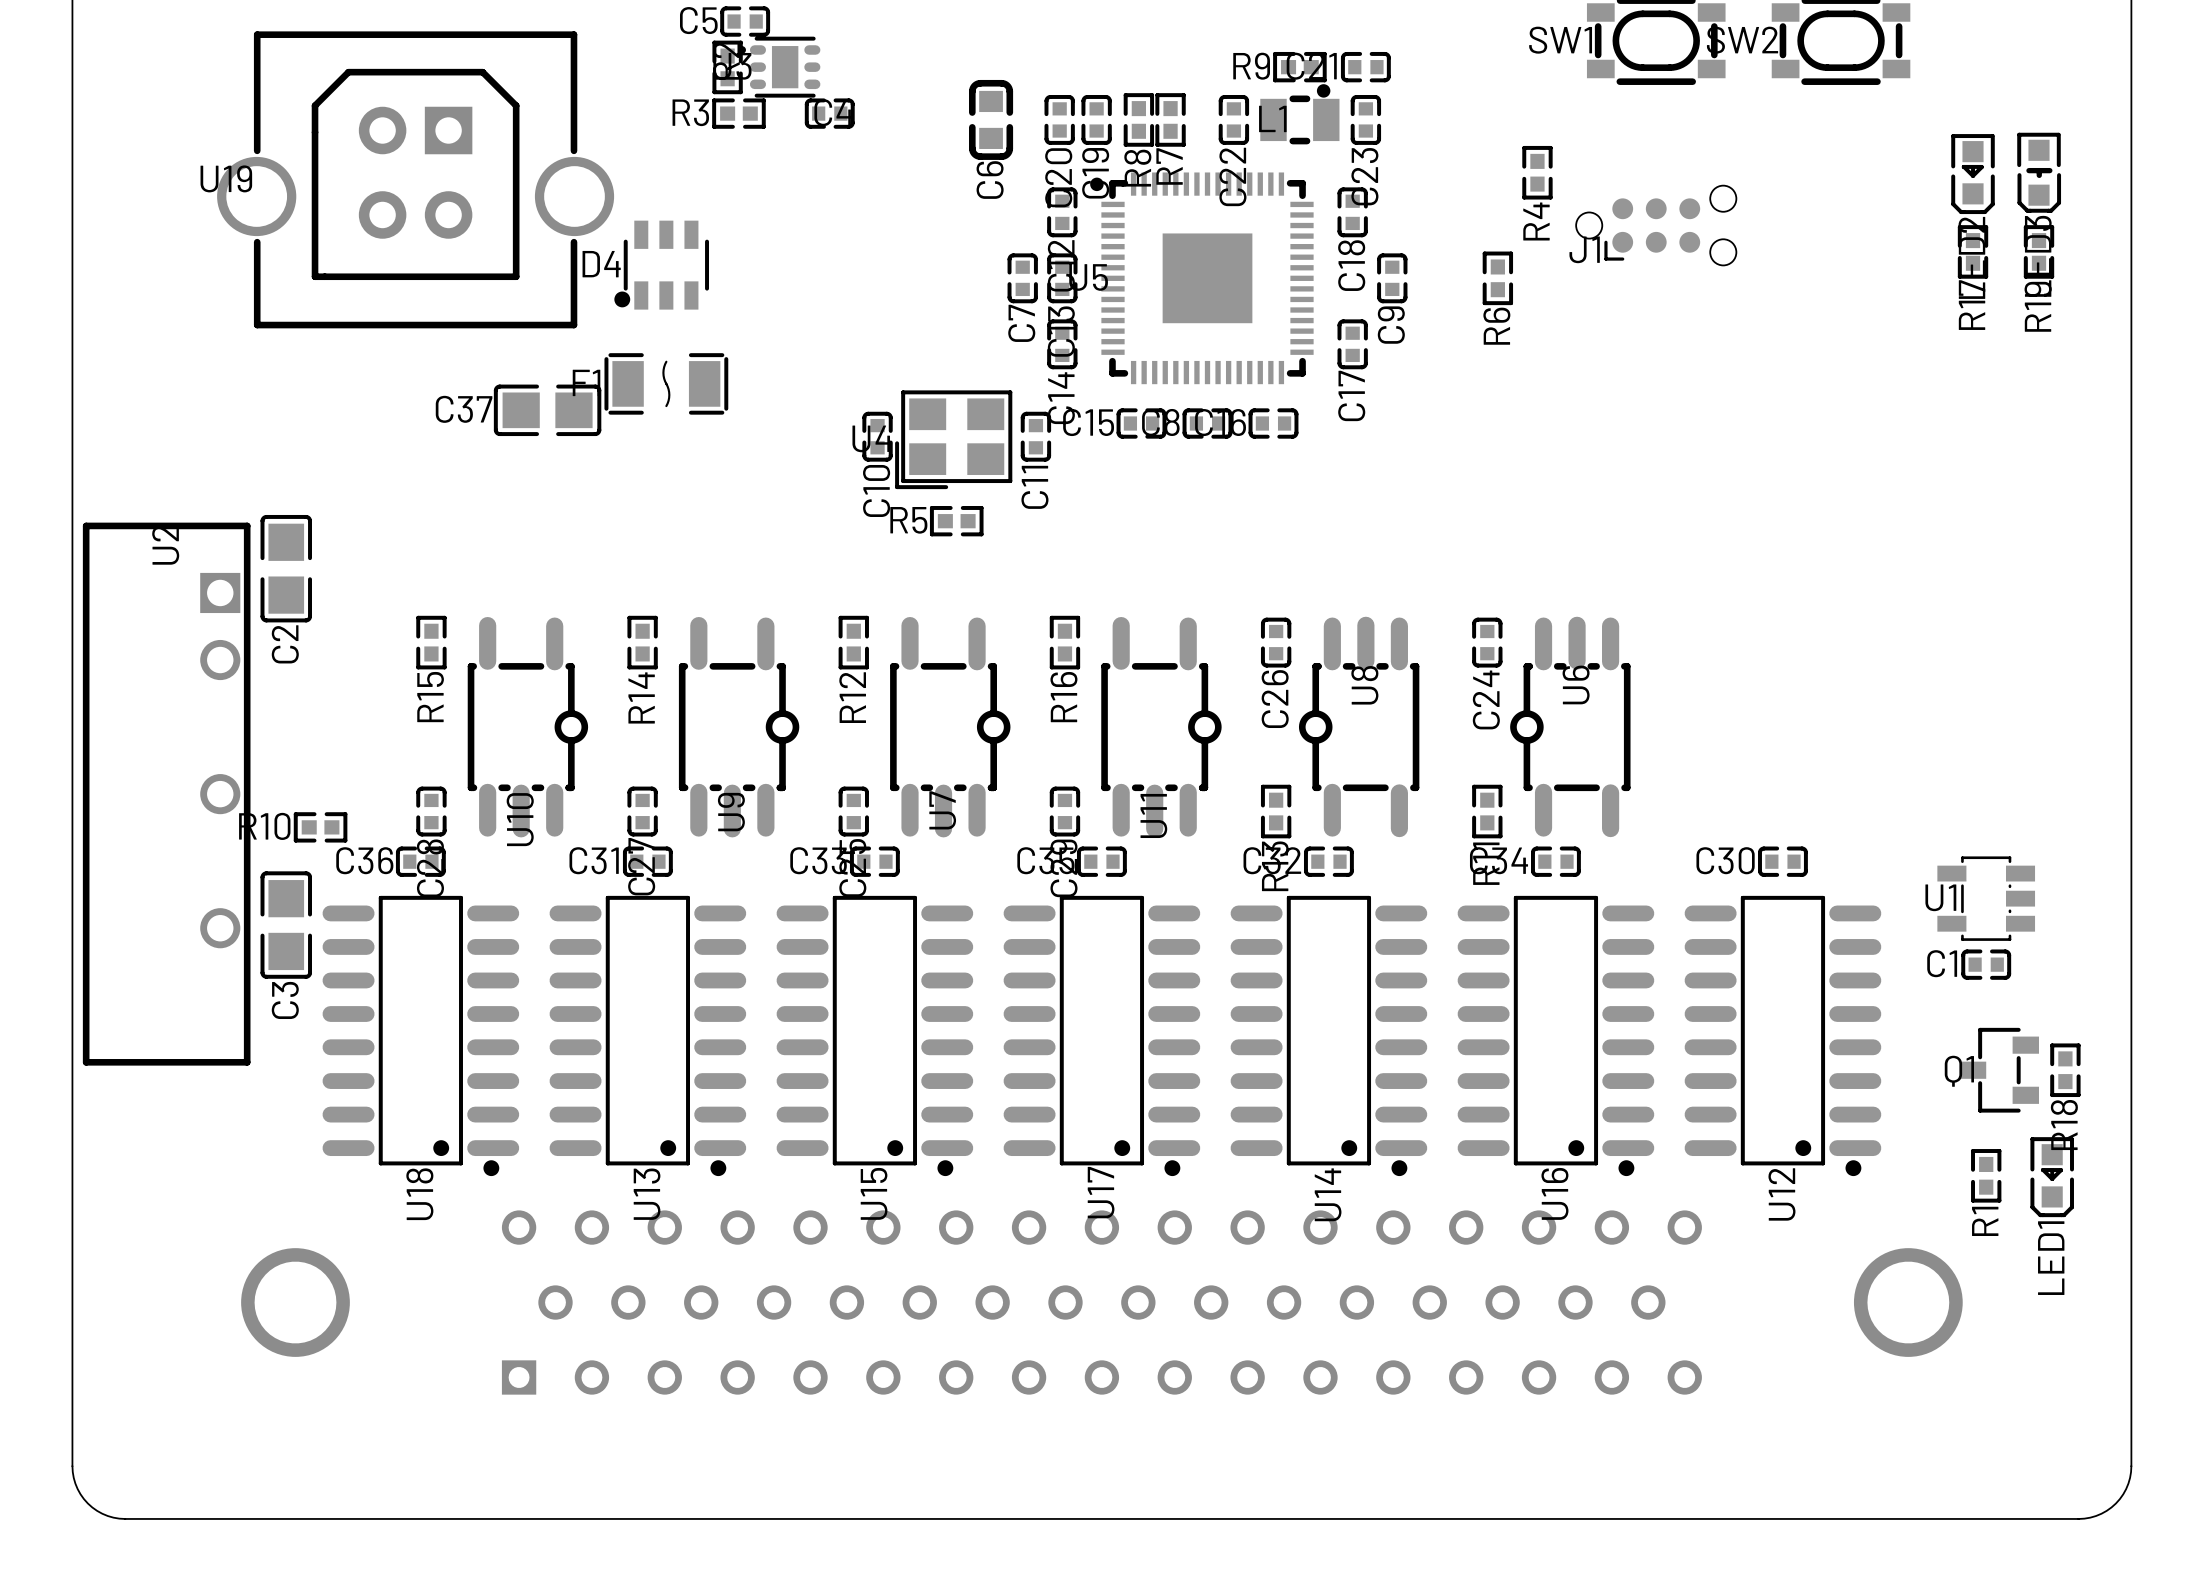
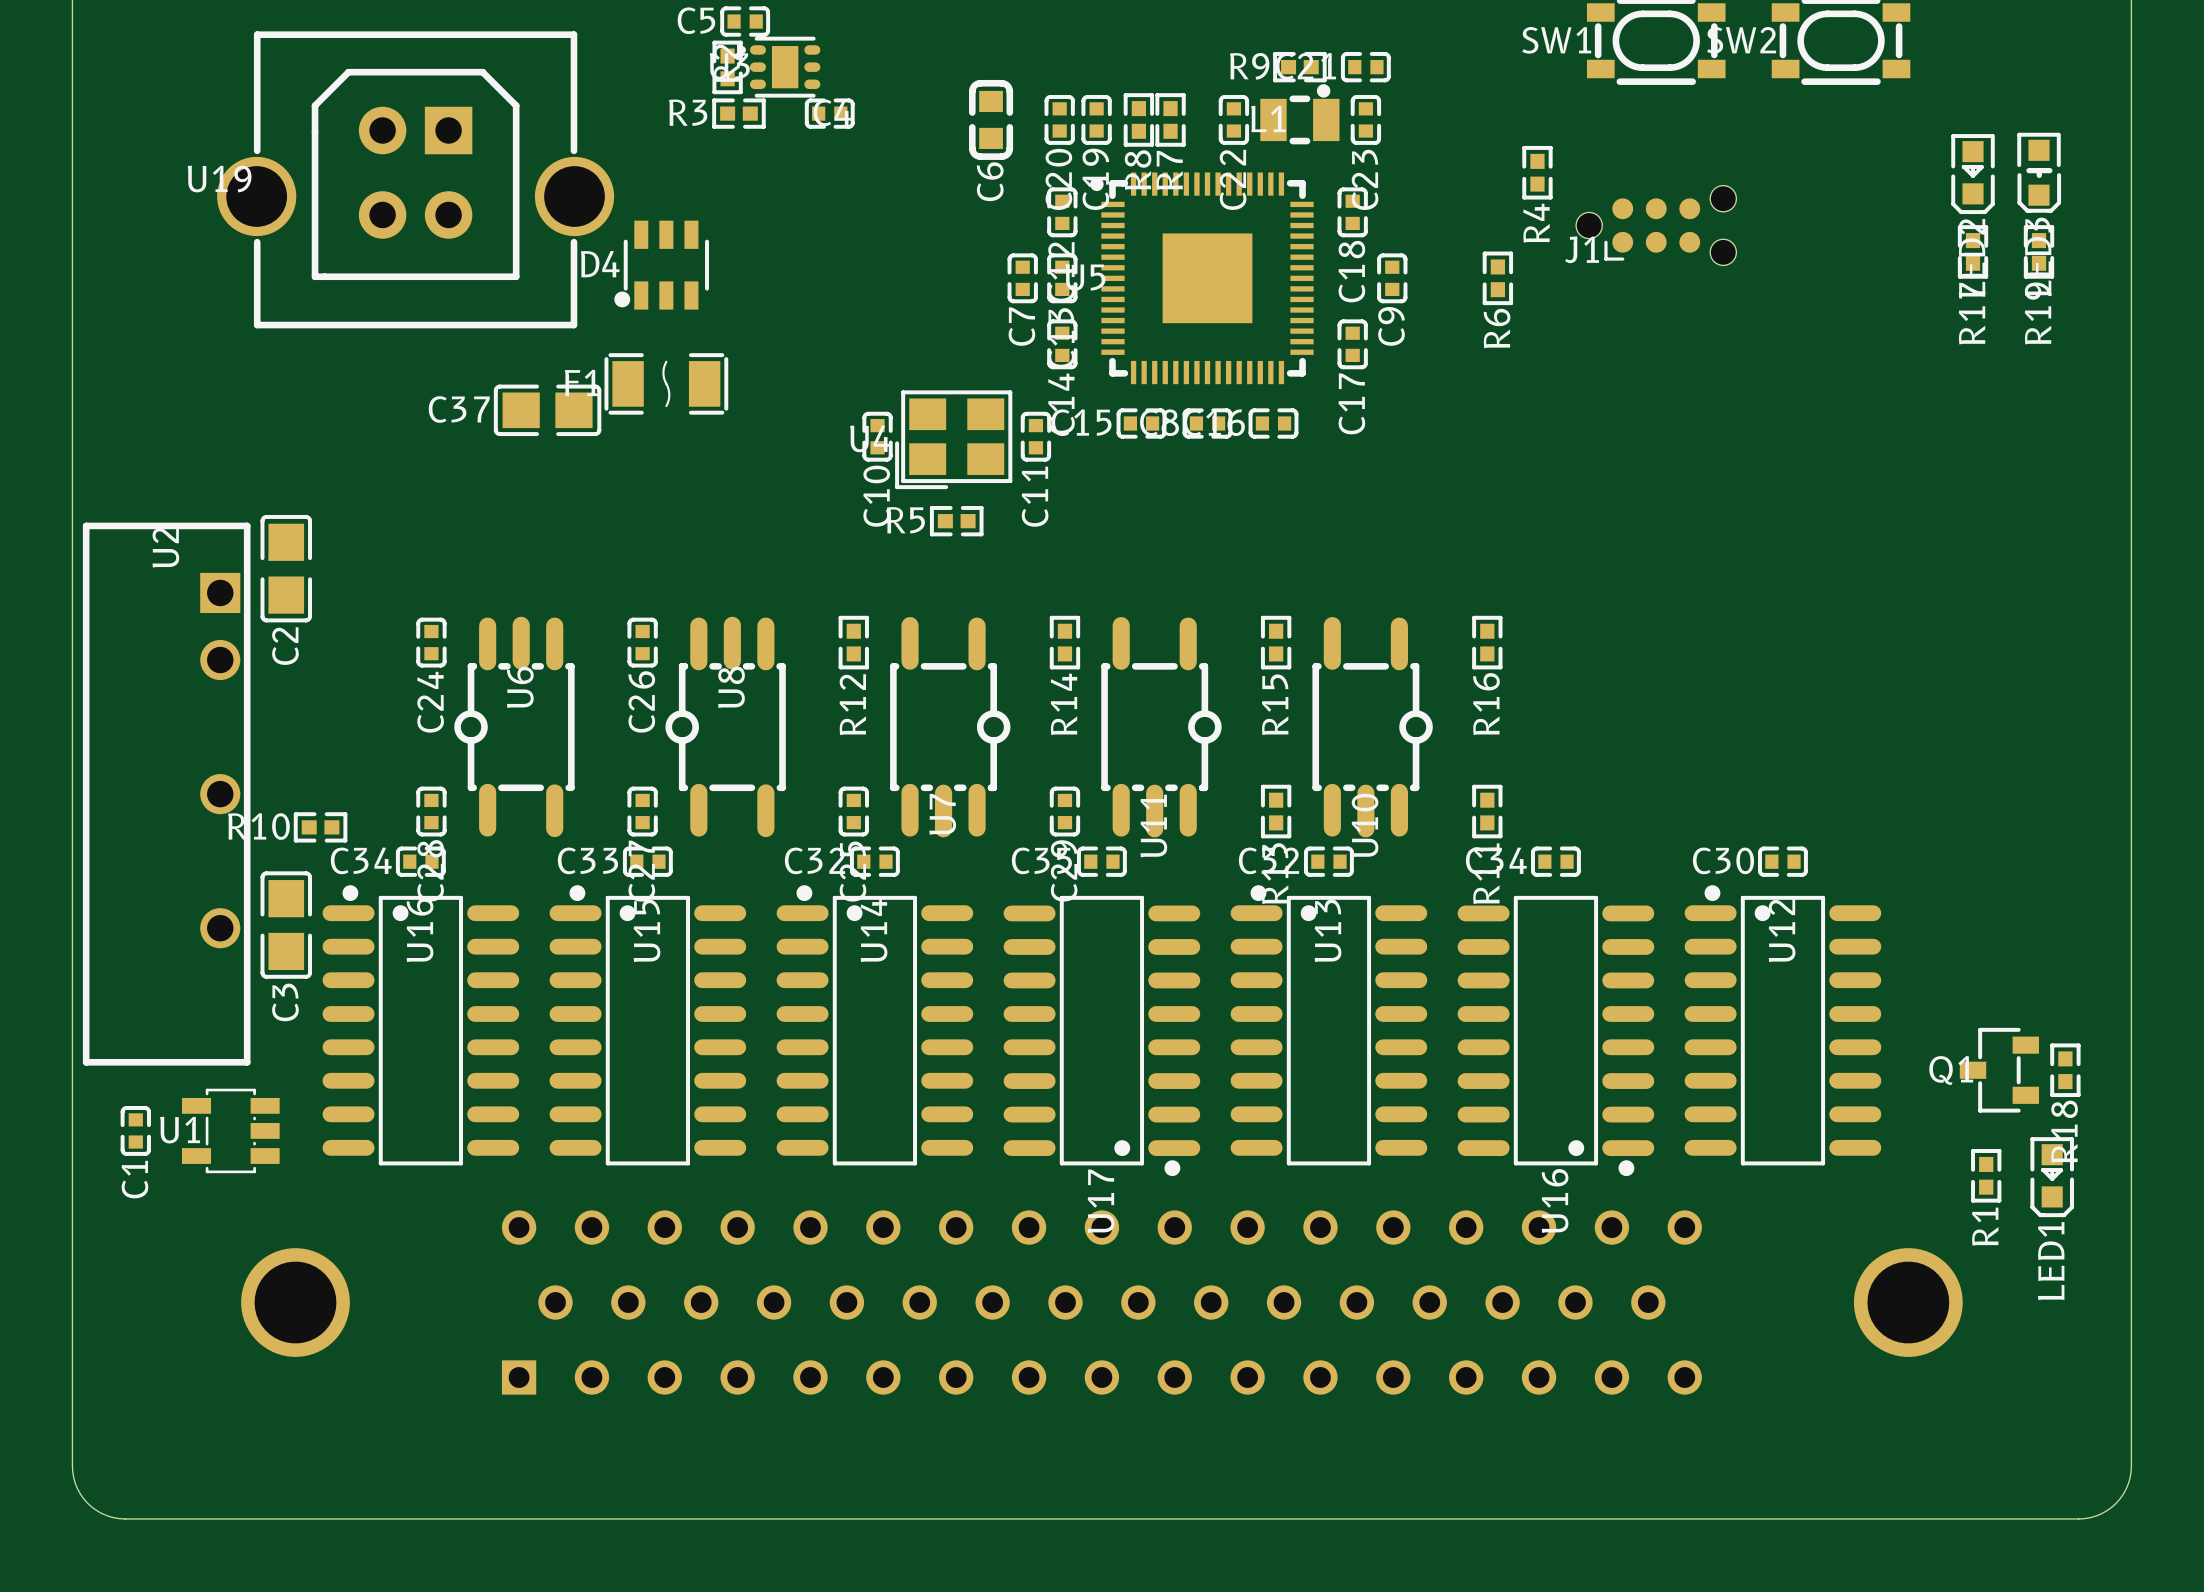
R15 position: (431, 642) -> (1276, 642)
R14: (642, 642) -> none
C26 position: (1276, 642) -> (642, 642)
C24 position: (1487, 642) -> (431, 642)
R16: none -> (1487, 642)
R16 name: R16 (1063, 697) -> R14 (1063, 704)
U8 position: (1359, 726) -> (725, 726)
U6 position: (1570, 726) -> (514, 726)
U10 position: (527, 727) -> (1372, 727)
U9: (739, 727) -> none
C36 name: C36 (364, 860) -> C34 (361, 860)
C31 name: C31 (594, 860) -> C33 (587, 860)
C33 name: C33 (818, 860) -> C32 (814, 860)
U1 position: (1986, 898) -> (230, 1130)
C1 name position: C1 (1942, 963) -> C1 (134, 1179)
C1 rotation: 0° (1986, 964) -> 90° clockwise (135, 1130)
C1 position: (1986, 964) -> (135, 1130)
U16: none -> (420, 1025)
U18: (420, 1035) -> none
U13 rotation: 0° (647, 1035) -> 180° (1328, 1025)
U13 position: (647, 1035) -> (1328, 1025)
U15 rotation: 0° (874, 1035) -> 180° (647, 1025)
U15 position: (874, 1035) -> (647, 1025)
U14 rotation: 0° (1328, 1035) -> 180° (874, 1025)
U14 position: (1328, 1035) -> (874, 1025)
U12 rotation: 0° (1782, 1035) -> 180° (1782, 1025)
U15 name position: U15 (874, 1193) -> U15 (647, 930)
U13 name position: U13 (647, 1194) -> U13 (1328, 930)
U14 name position: U14 (1328, 1194) -> U14 (874, 930)
U12 name position: U12 (1781, 1194) -> U12 (1782, 930)

